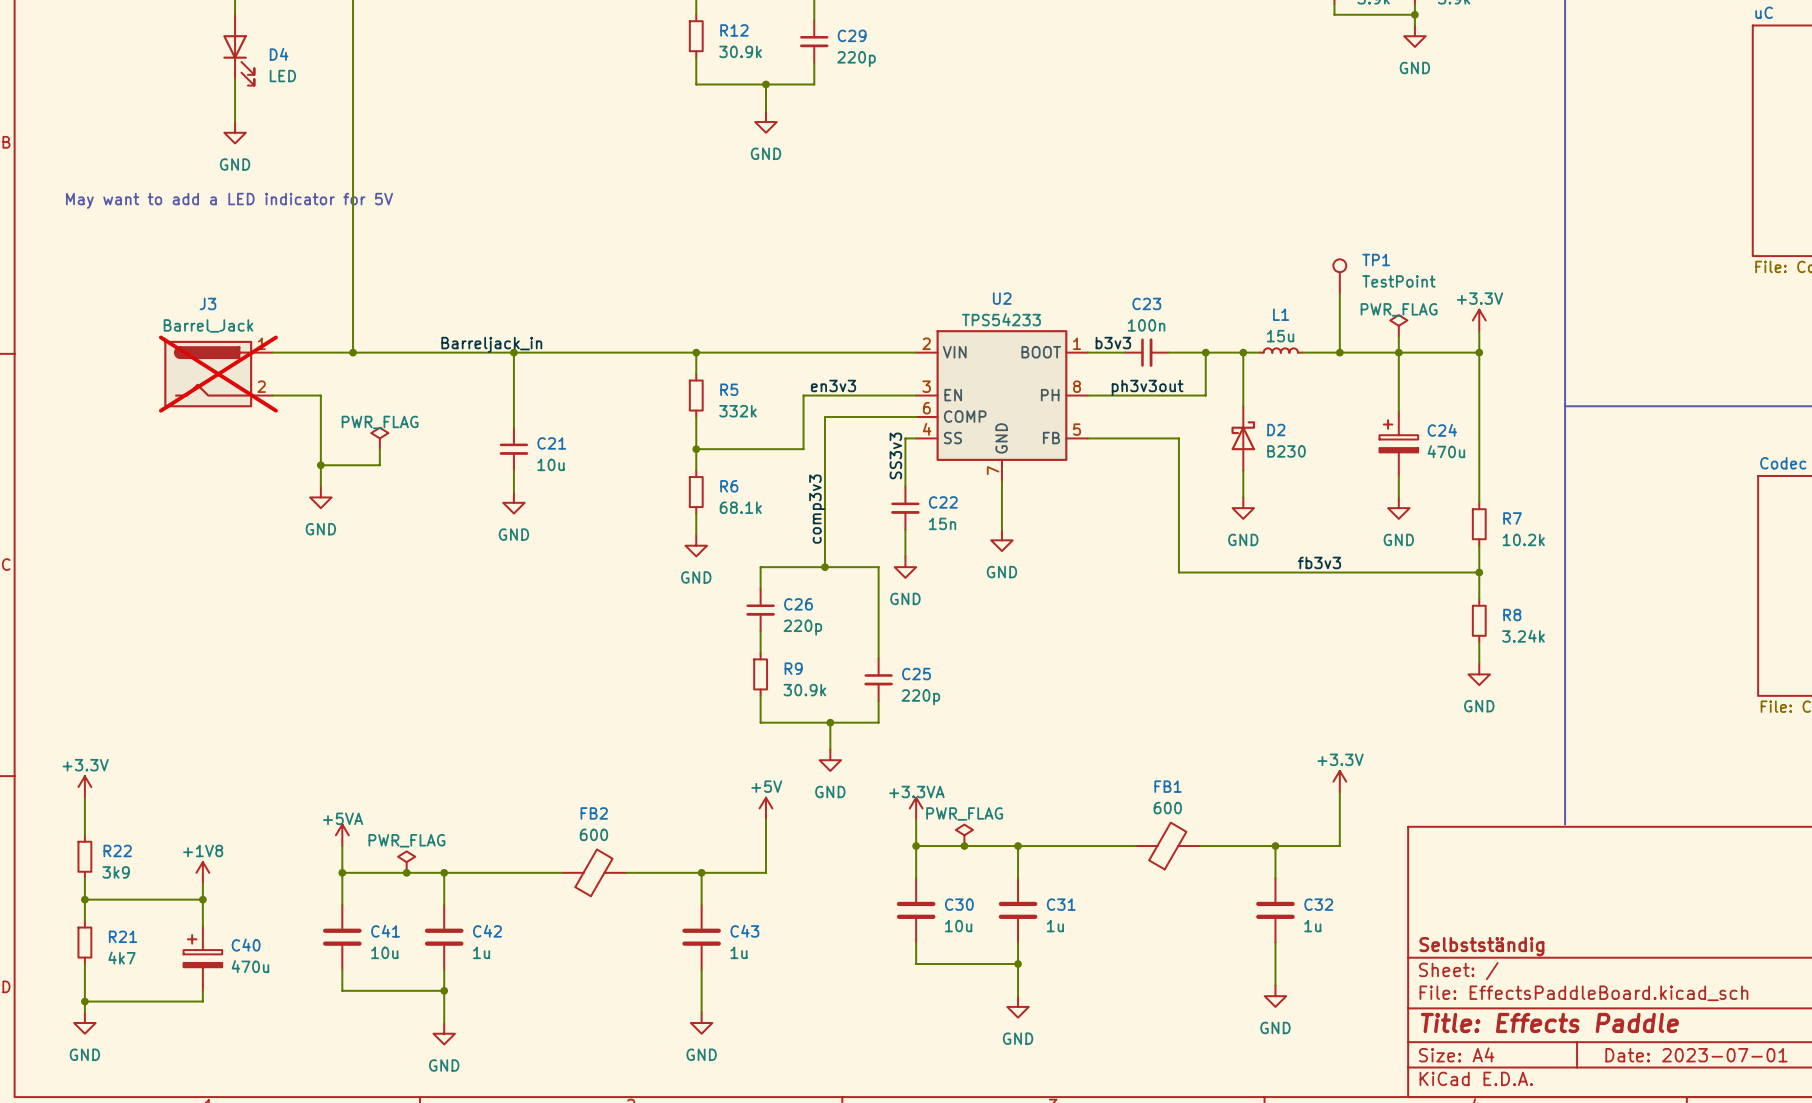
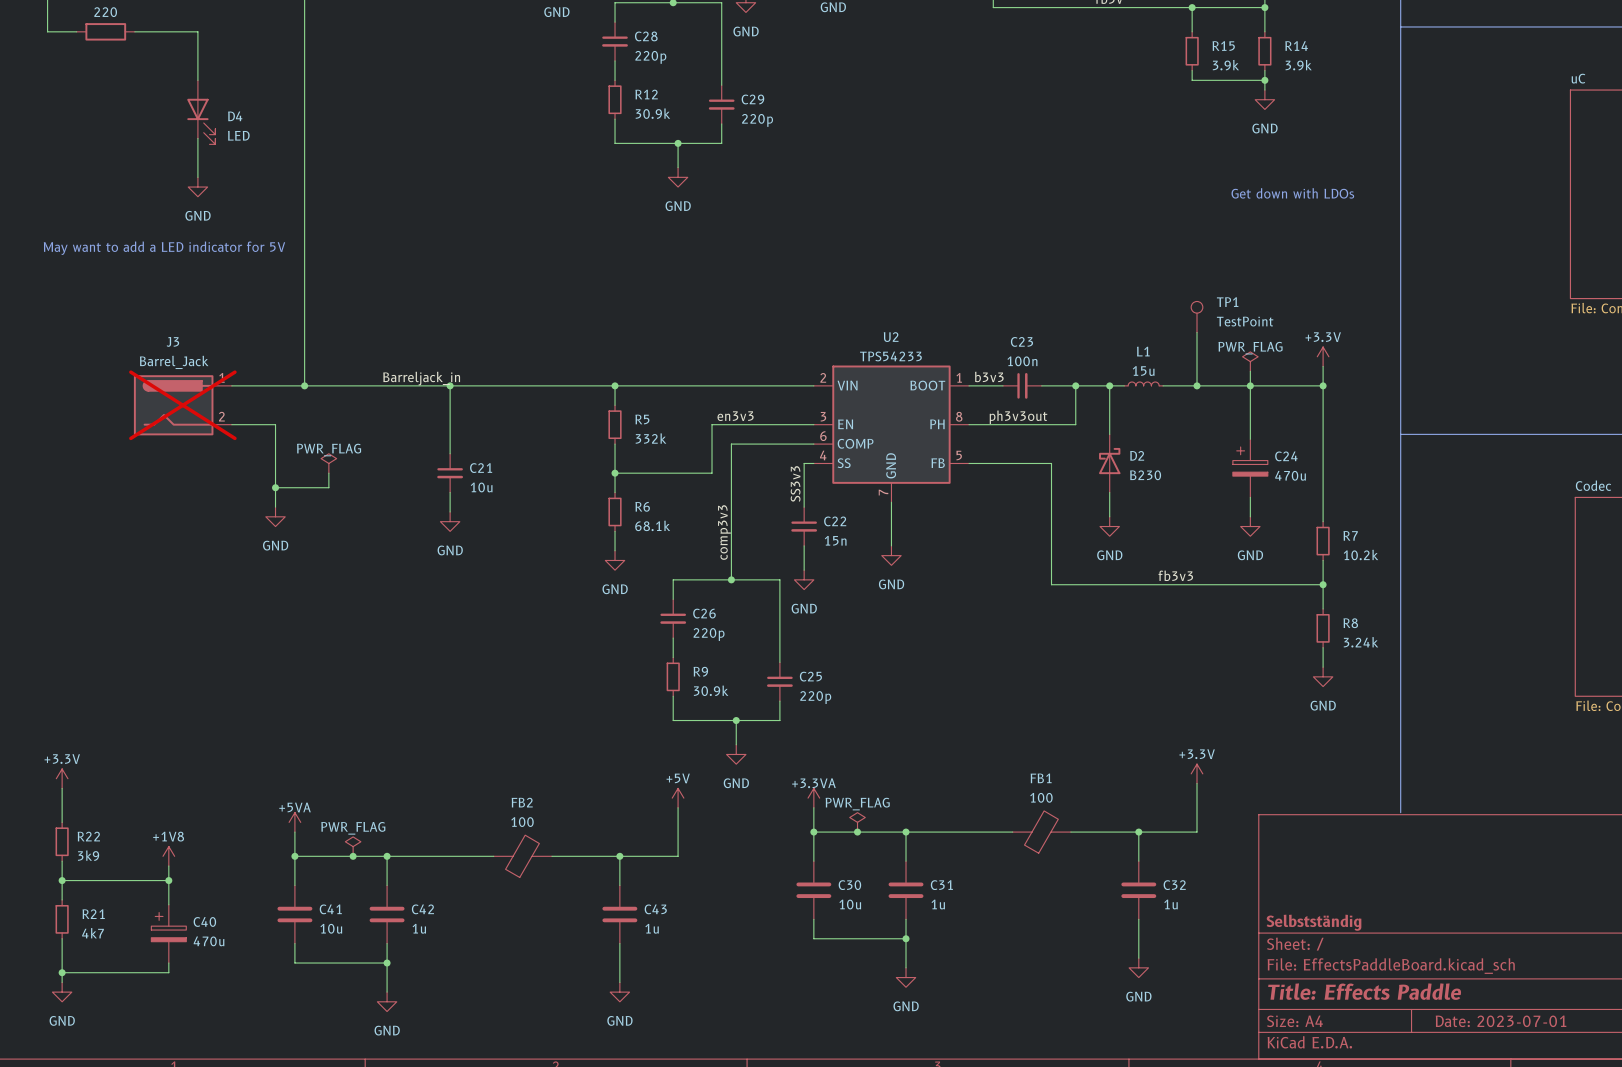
text: none -> Get down with LDOs (1292, 193)
FB1 value: 600 (1167, 808) -> 100 (1041, 797)
FB2 value: 600 (593, 834) -> 100 (522, 822)

